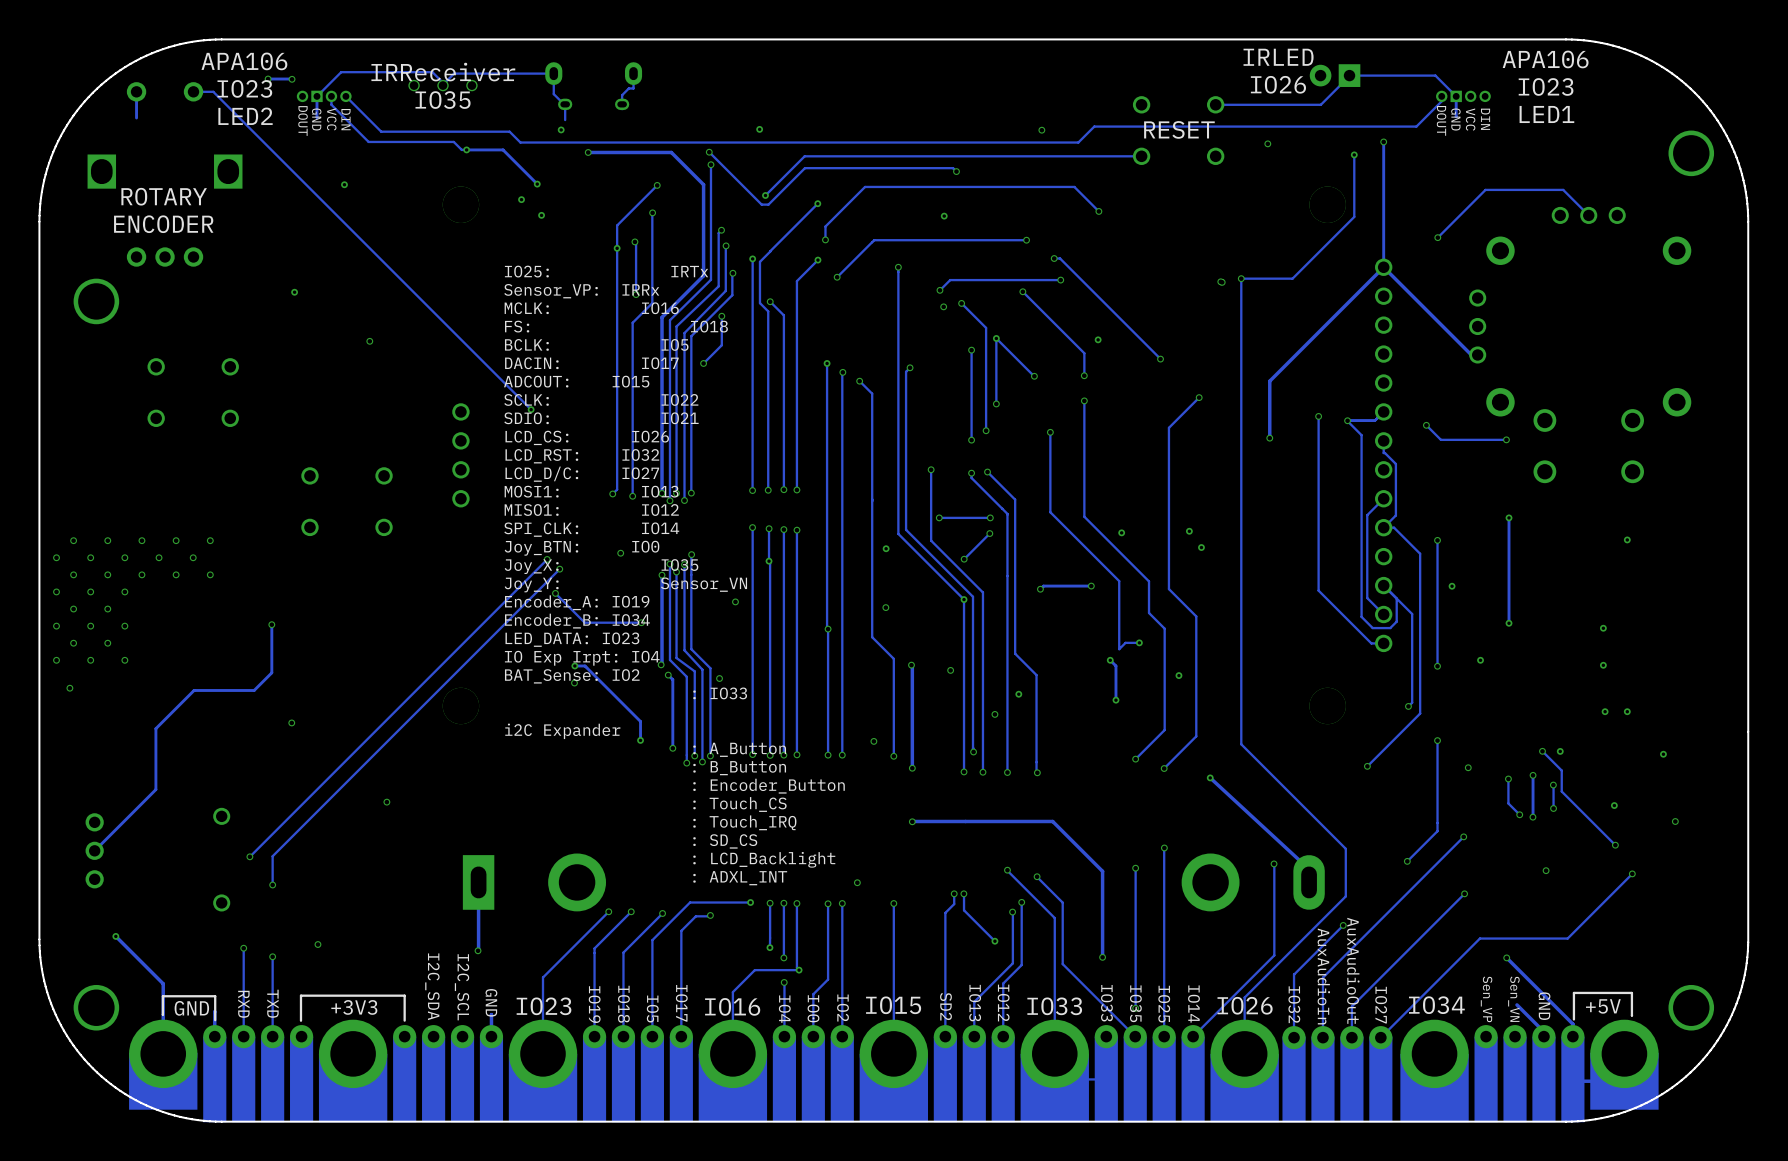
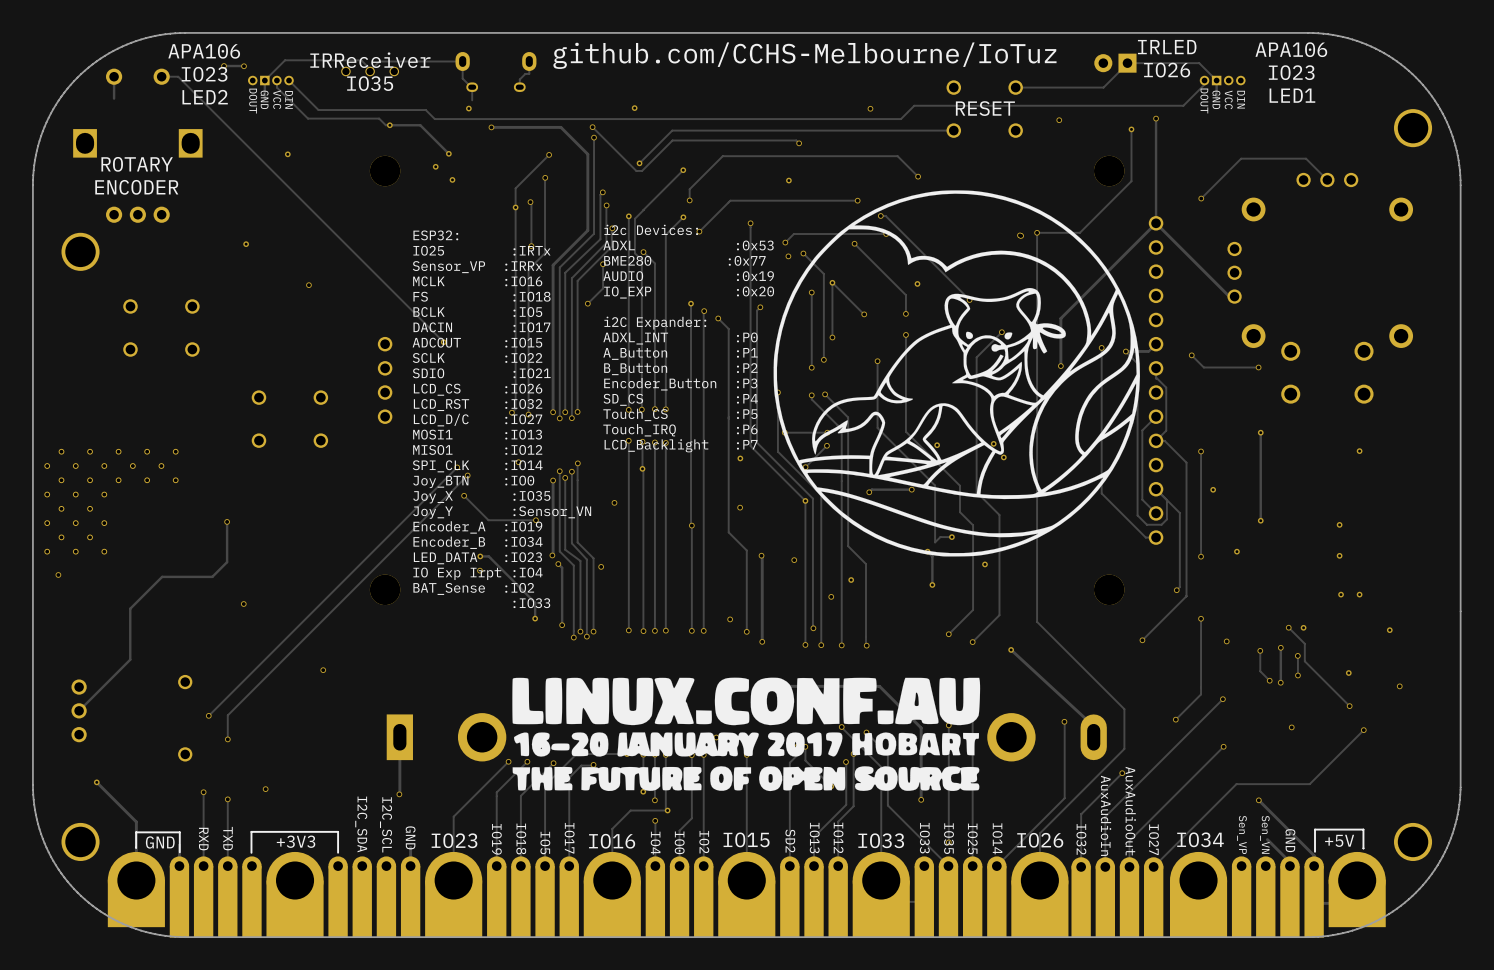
text position: IRLED (1278, 57) -> IRLED (1167, 47)
text: none -> github.com/CCHS-Melbourne/IoTuz (804, 55)
text position: IO26 (1278, 84) -> IO26 (1167, 70)
drawing: none -> [773, 190, 1141, 557]
text: IO25: IRTx (606, 271) -> ADXL :0x53 (688, 245)
text: none -> i2c Devices: (651, 229)
text: none -> ESP32: (435, 235)
text: Sensor_VP: IRRx (581, 291) -> none
text: none -> IO25 :IRTx (481, 250)
text: MCLK: IO16 (591, 308) -> none
text: none -> BME280 :0x77 (684, 260)
text: none -> Sensor_VP :IRRx (477, 267)
text: FS: IO18 (616, 326) -> none
text: none -> AUDIO :0x19 (688, 276)
text: none -> MCLK :IO16 (477, 281)
text: BCLK: IO5 (596, 344) -> none
text: none -> IO_EXP :0x20 (689, 292)
text: none -> FS :IO18 (482, 296)
text: DACIN: IO17 (591, 363) -> none
text: none -> BCLK :IO5 (477, 312)
text: ADCOUT: IO15 (576, 381) -> none
text: none -> i2C Expander: (655, 323)
text: none -> DACIN :IO17 (481, 327)
text: SCLK: IO22 (601, 399) -> none
text: none -> ADXL_INT :P0 (680, 338)
text: none -> ADCOUT :IO15 (477, 342)
text: SDIO: IO21 (601, 418) -> none
text: none -> A_Button :P1 (680, 353)
text: none -> SCLK :IO22 (477, 358)
text: LCD_CS: IO26 (587, 437) -> none
text: none -> B_Button :P2 (680, 369)
text: none -> SDIO :IO21 (481, 373)
text: LCD_RST: IO32 (582, 456) -> none
text: none -> Encoder_Button :P3 (680, 384)
text: none -> LCD_CS :IO26 (478, 389)
text: LCD_D/C: IO27 (582, 474) -> none
text: none -> SD_CS :P4 (680, 399)
text: none -> LCD_RST :IO32 (478, 405)
text: MOSI1: IO13 (591, 491) -> none
text: none -> Touch_CS :P5 (680, 414)
text: none -> LCD_D/C :IO27 (478, 420)
text: MISO1: IO12 (591, 510) -> none
text: none -> Touch_IRQ :P6 (680, 430)
text: none -> MOSI1 :IO13 (477, 434)
text: SPI_CLK: IO14 (591, 529) -> none
text: none -> LCD_Backlight :P7 (681, 445)
text: none -> MISO1 :IO12 (477, 449)
text: Joy_BTN: IO0 (582, 548) -> none
text: none -> SPI_CLK :IO14 (477, 466)
text: Joy_X: IO35 (601, 566) -> none
text: none -> Joy_BTN :IO0 (473, 481)
text: Joy_Y: Sensor_VN (625, 584) -> none
text: none -> Joy_X :IO35 (481, 497)
text: Encoder_A: IO19 (577, 602) -> none
text: none -> Joy_Y :Sensor_VN (502, 512)
text: Encoder_B: IO34 (577, 621) -> Encoder_A :IO19 (477, 527)
text: LED_DATA: IO23 (572, 639) -> none
text: none -> Encoder_B :IO34 (478, 542)
text: IO Exp Irpt: IO4 (582, 658) -> none
text: none -> LED_DATA :IO23 (477, 558)
text: BAT_Sense: IO2 (572, 676) -> none
text: none -> IO Exp Irpt :IO4 (478, 573)
text: : IO33 (720, 693) -> none
text: none -> BAT_Sense :IO2 (473, 588)
text: none -> :IO33 (531, 603)
text: i2C Expander (562, 731) -> none
text: : A_Button (739, 749) -> none
text: : B_Button (739, 768) -> none
text: : Encoder_Button (769, 786) -> none
text: : Touch_CS (739, 804) -> none
drawing: none -> [512, 677, 981, 792]
text: : Touch_IRQ (744, 822) -> none
text: : SD_CS (725, 841) -> none
text: : LCD_Backlight (764, 859) -> none
text: : ADXL_INT (740, 878) -> none

